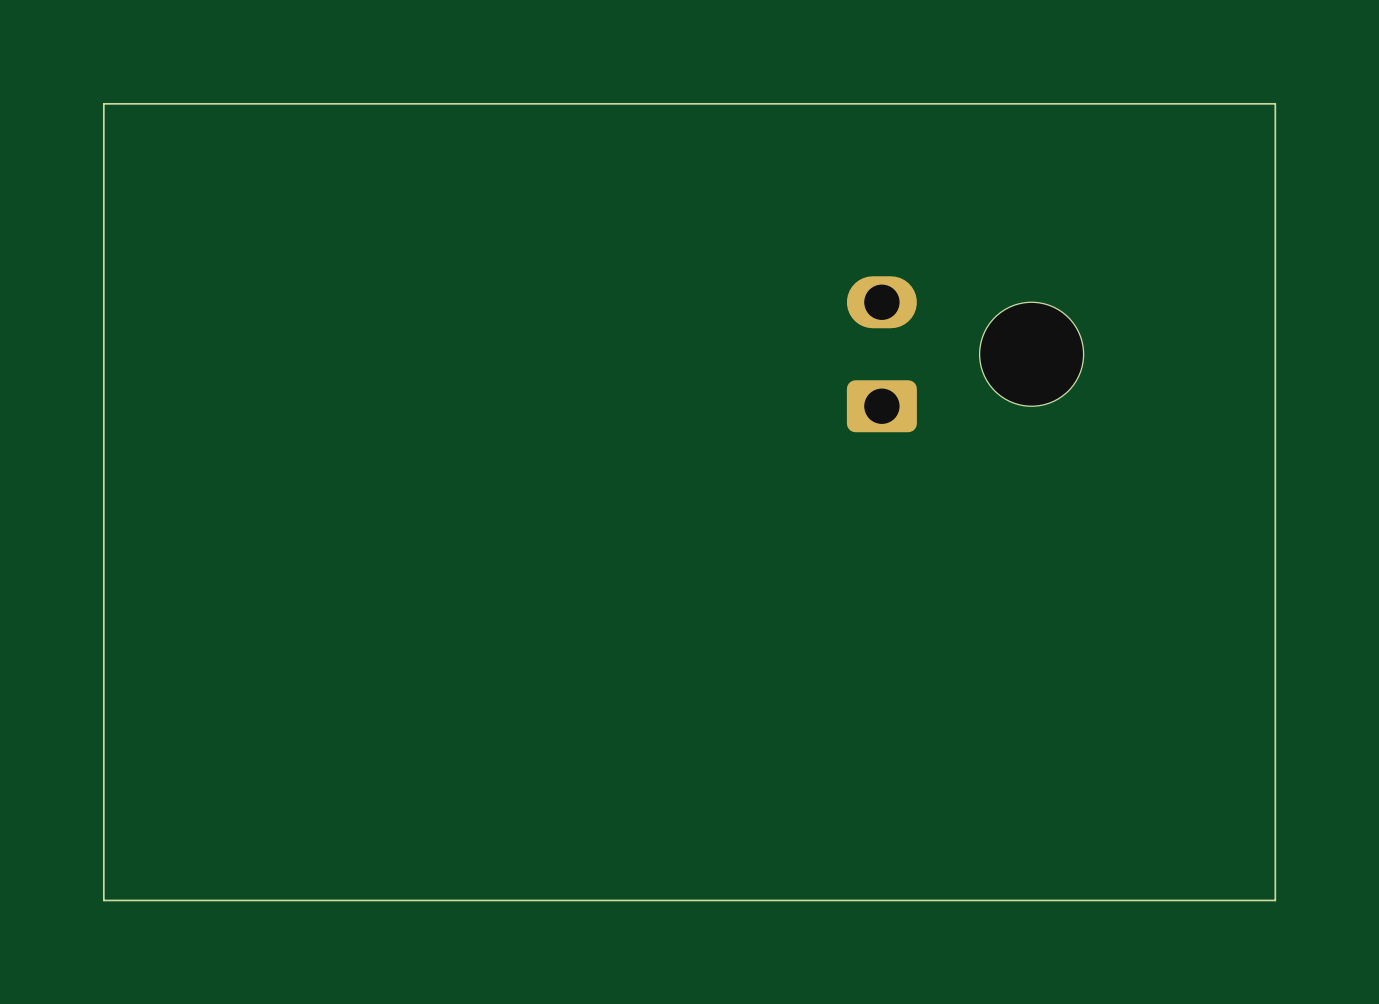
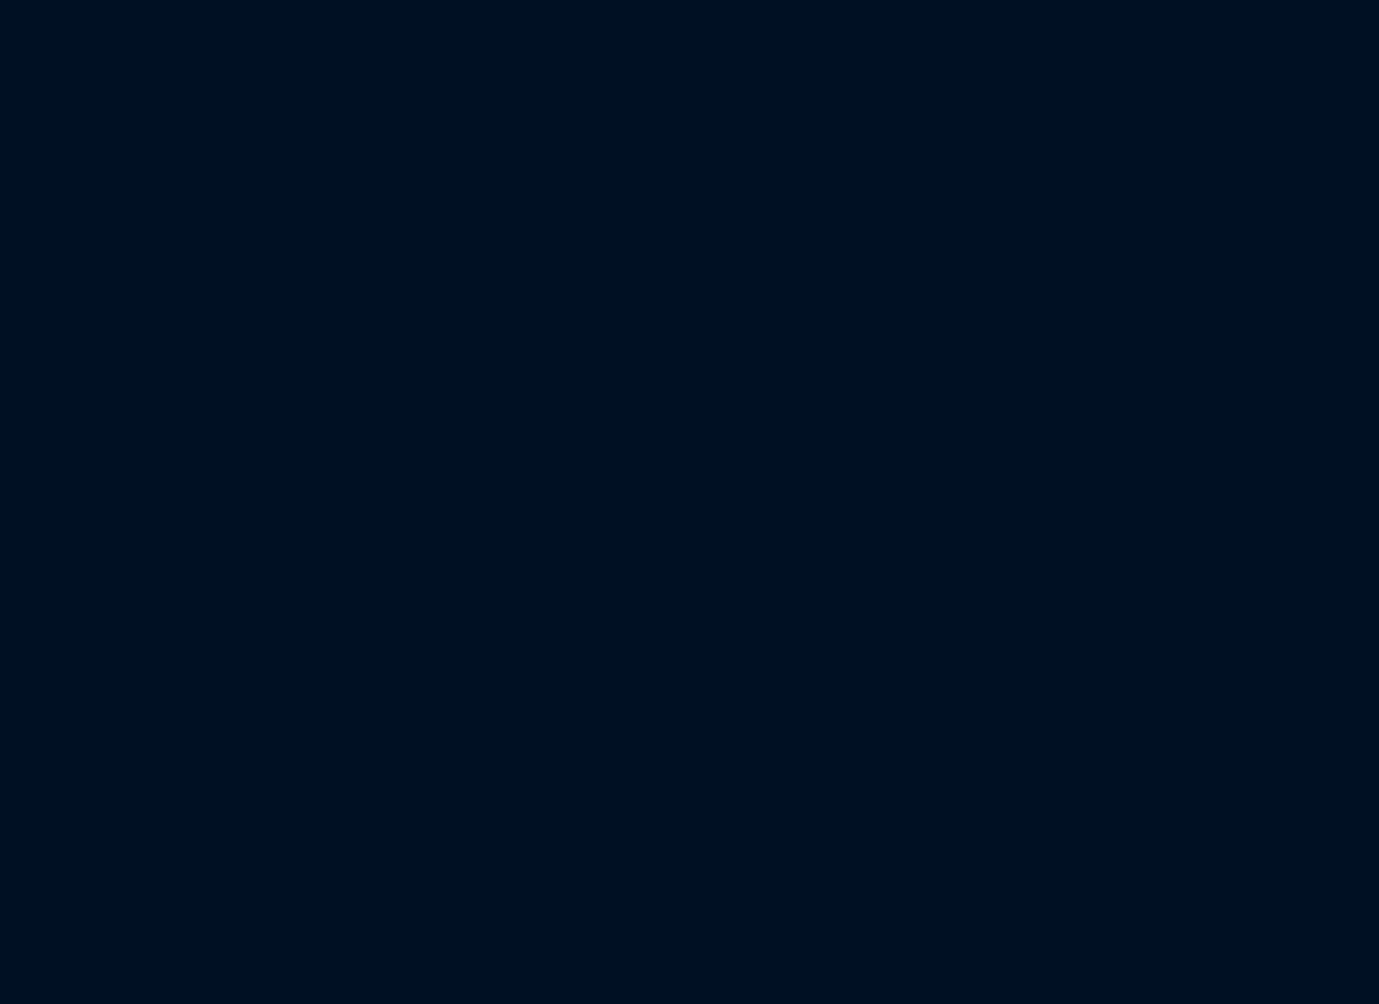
board edge: (1275, 103) (103, 103) (103, 900) (1275, 900) (1275, 103) -> none
part: (965, 354) -> none

